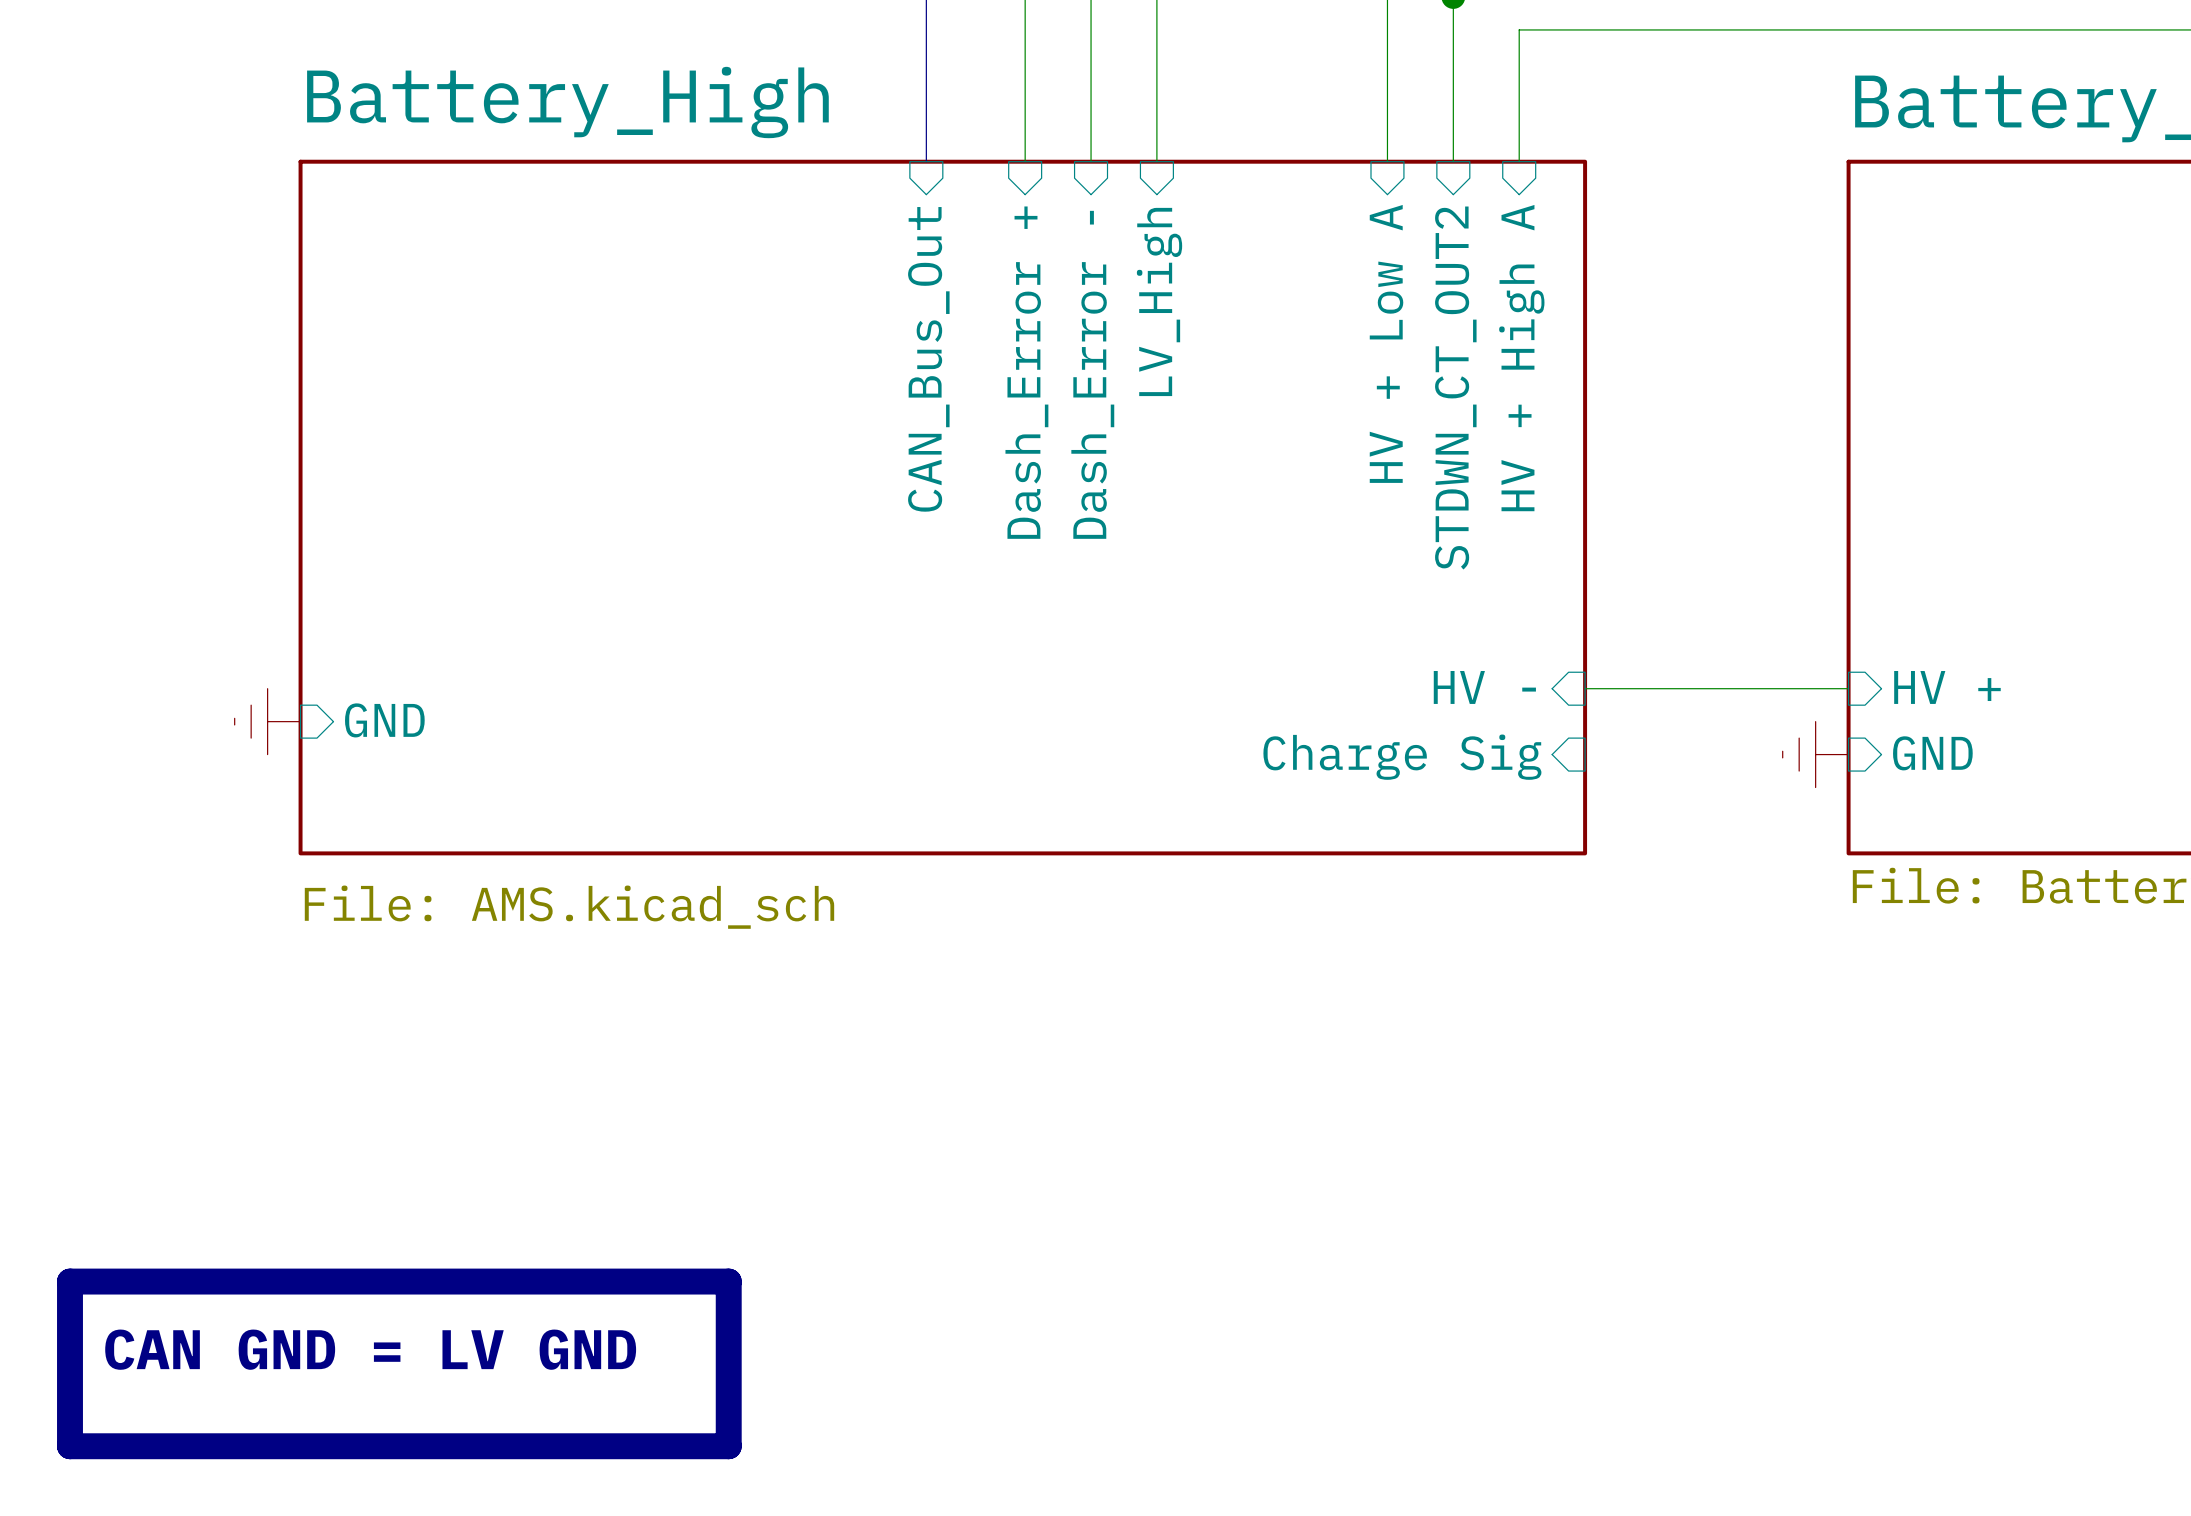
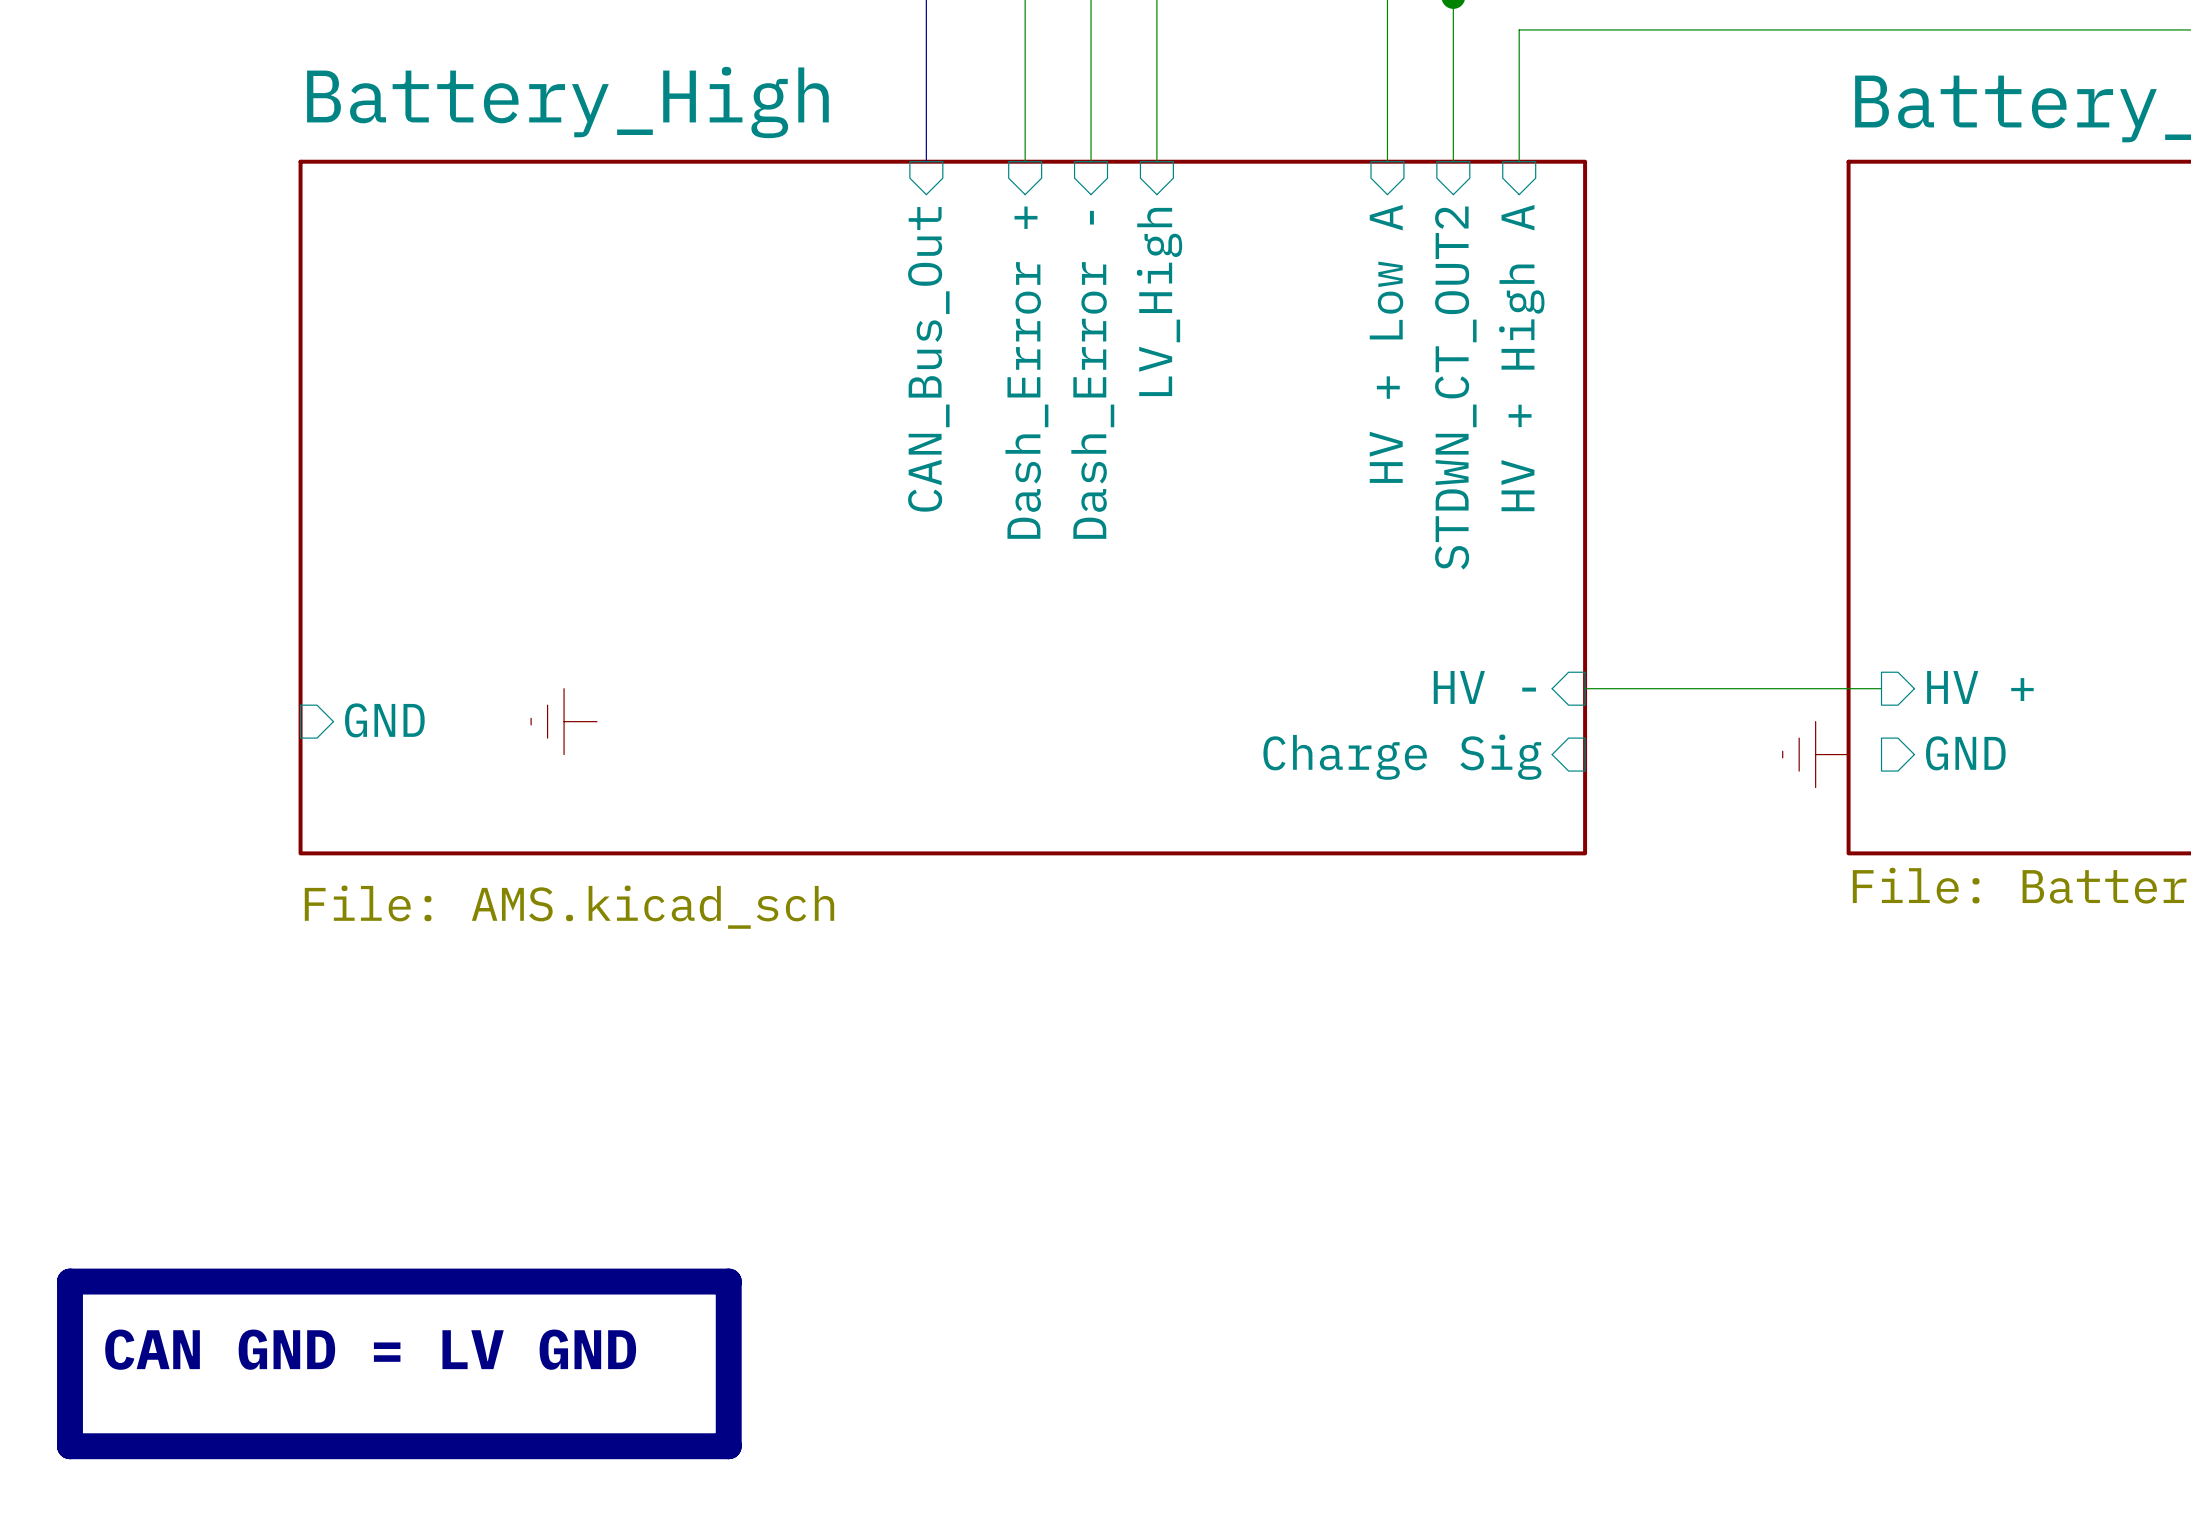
sheet pin position: HV + (1947, 687) -> HV + (1980, 687)
wire: none -> (1848, 688) (1881, 688)
power symbol position: (267, 721) -> (564, 721)
sheet pin position: GND (1932, 753) -> GND (1965, 753)

